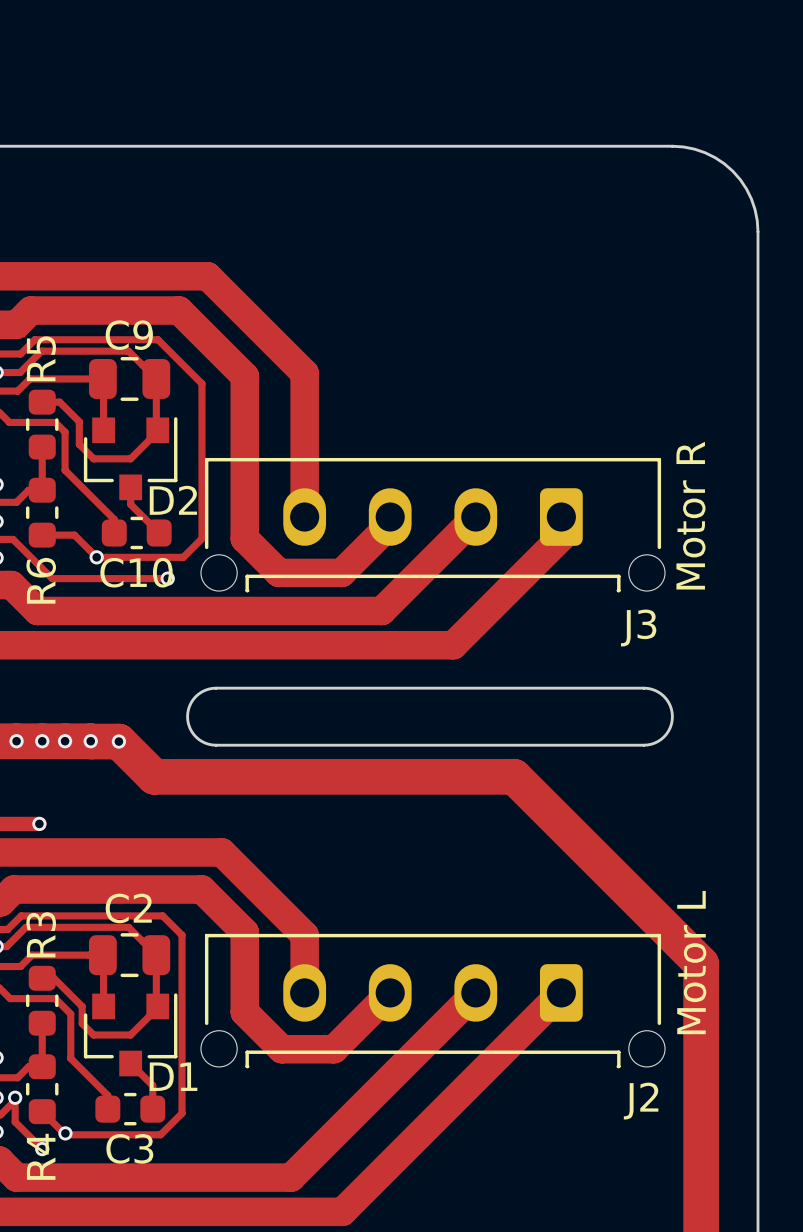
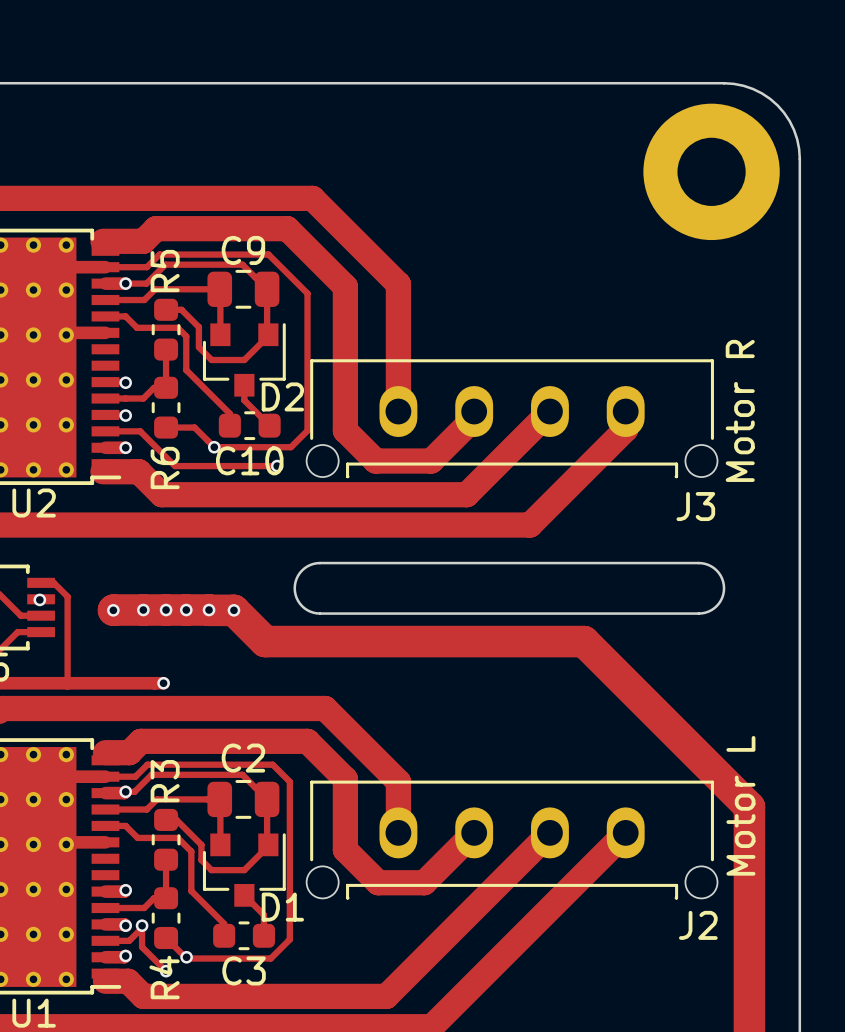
part: none -> (711, 171)
J3 footprint: [200, 457, 666, 593] -> [306, 359, 718, 479]
J2 footprint: [200, 933, 666, 1069] -> [306, 780, 718, 900]

